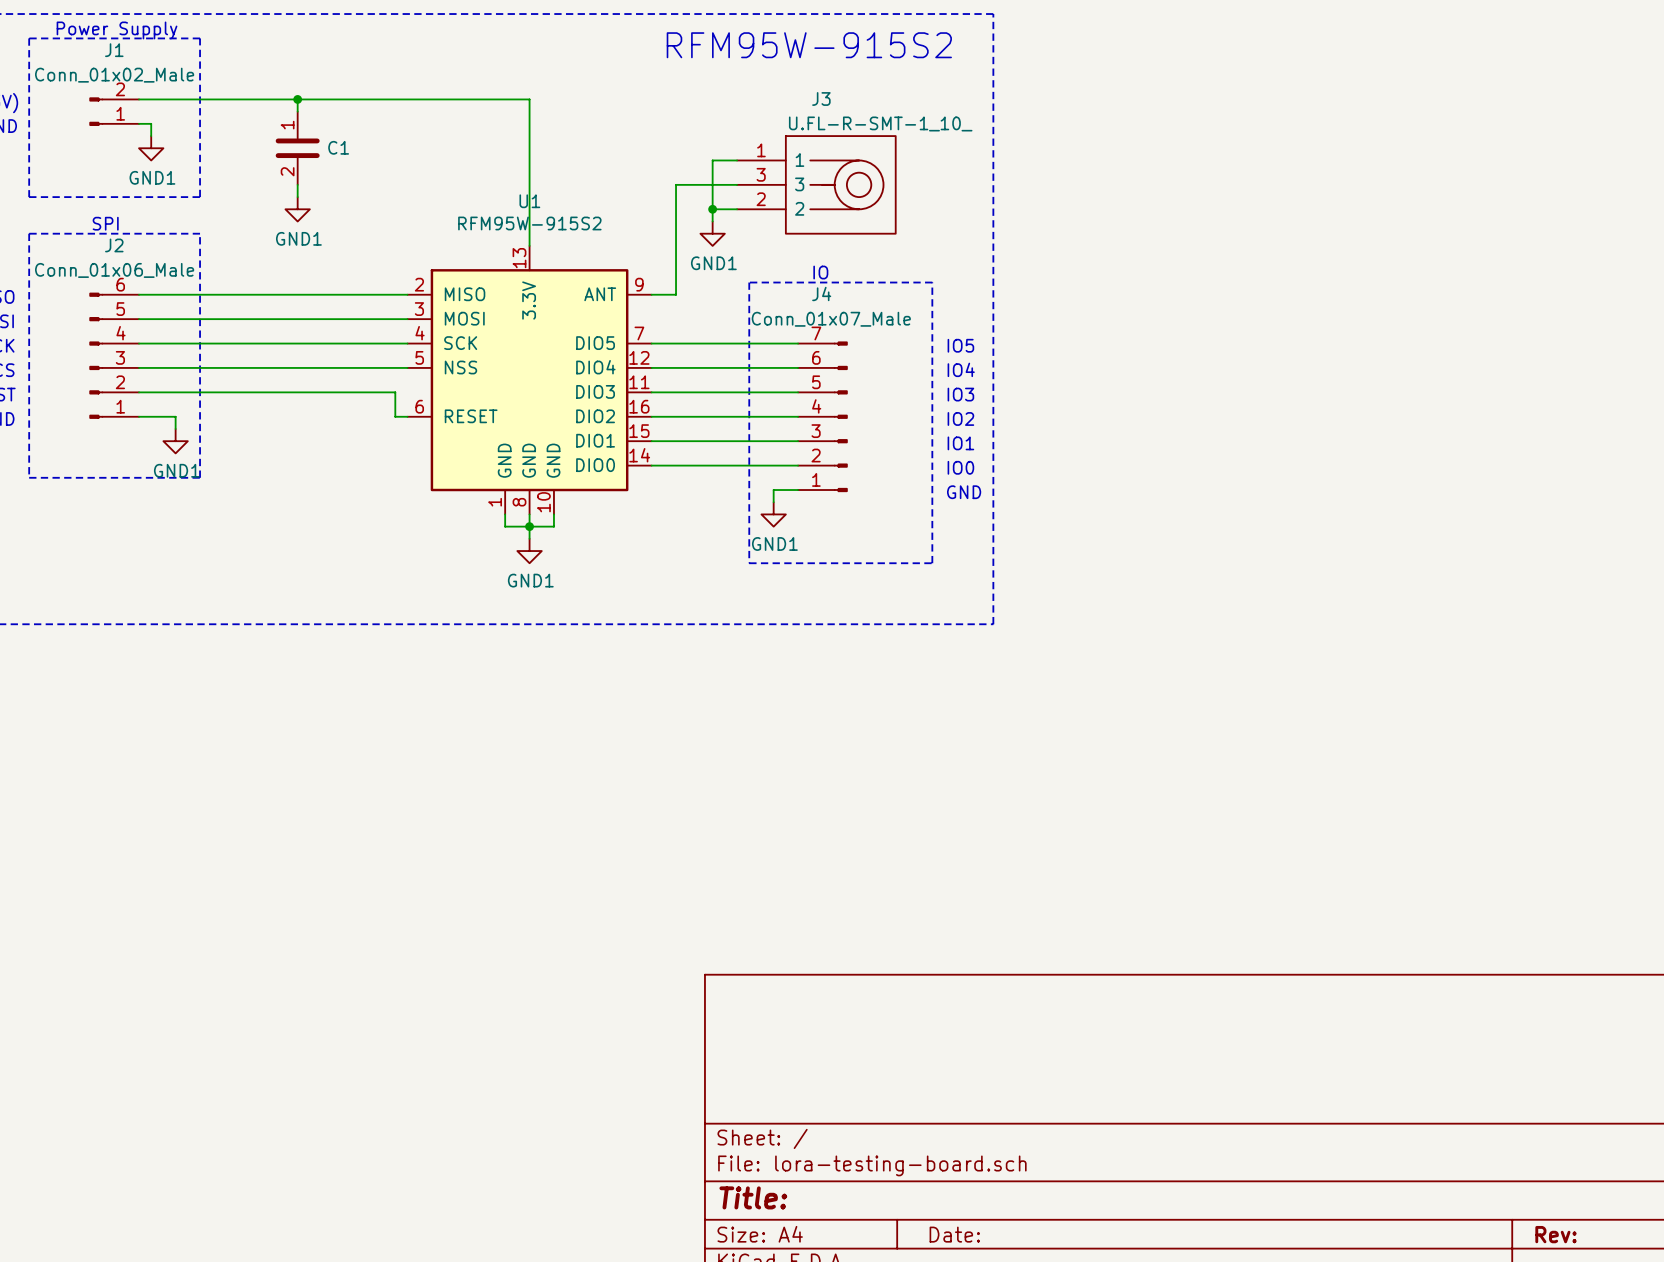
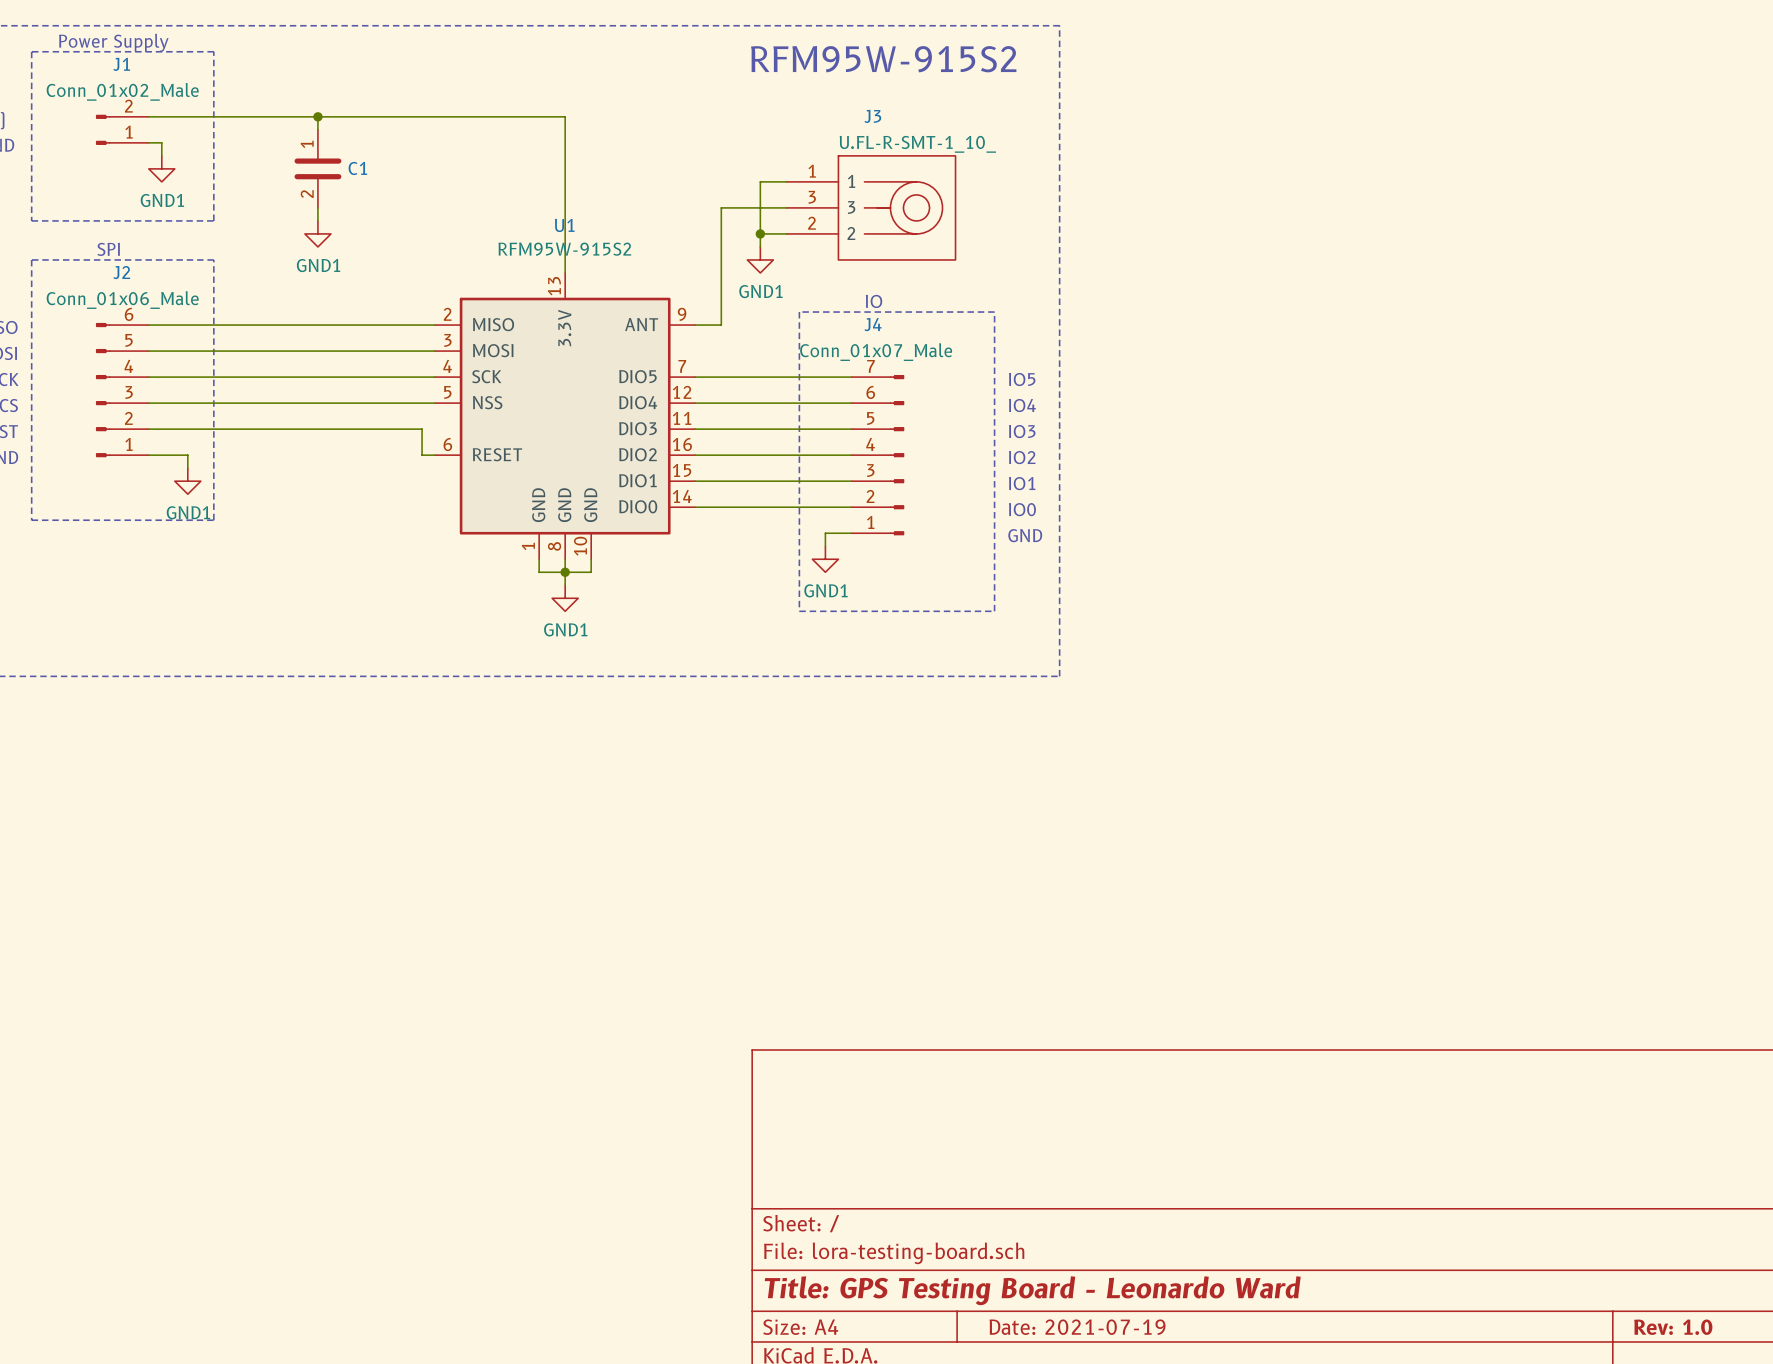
title block: Title: (753, 1197) -> Title: GPS Testing Board - Leonardo Ward (1032, 1290)
title block: Date: (954, 1234) -> Date: 2021-07-19 (1077, 1327)
title block: Rev: (1555, 1234) -> Rev: 1.0 (1673, 1327)

